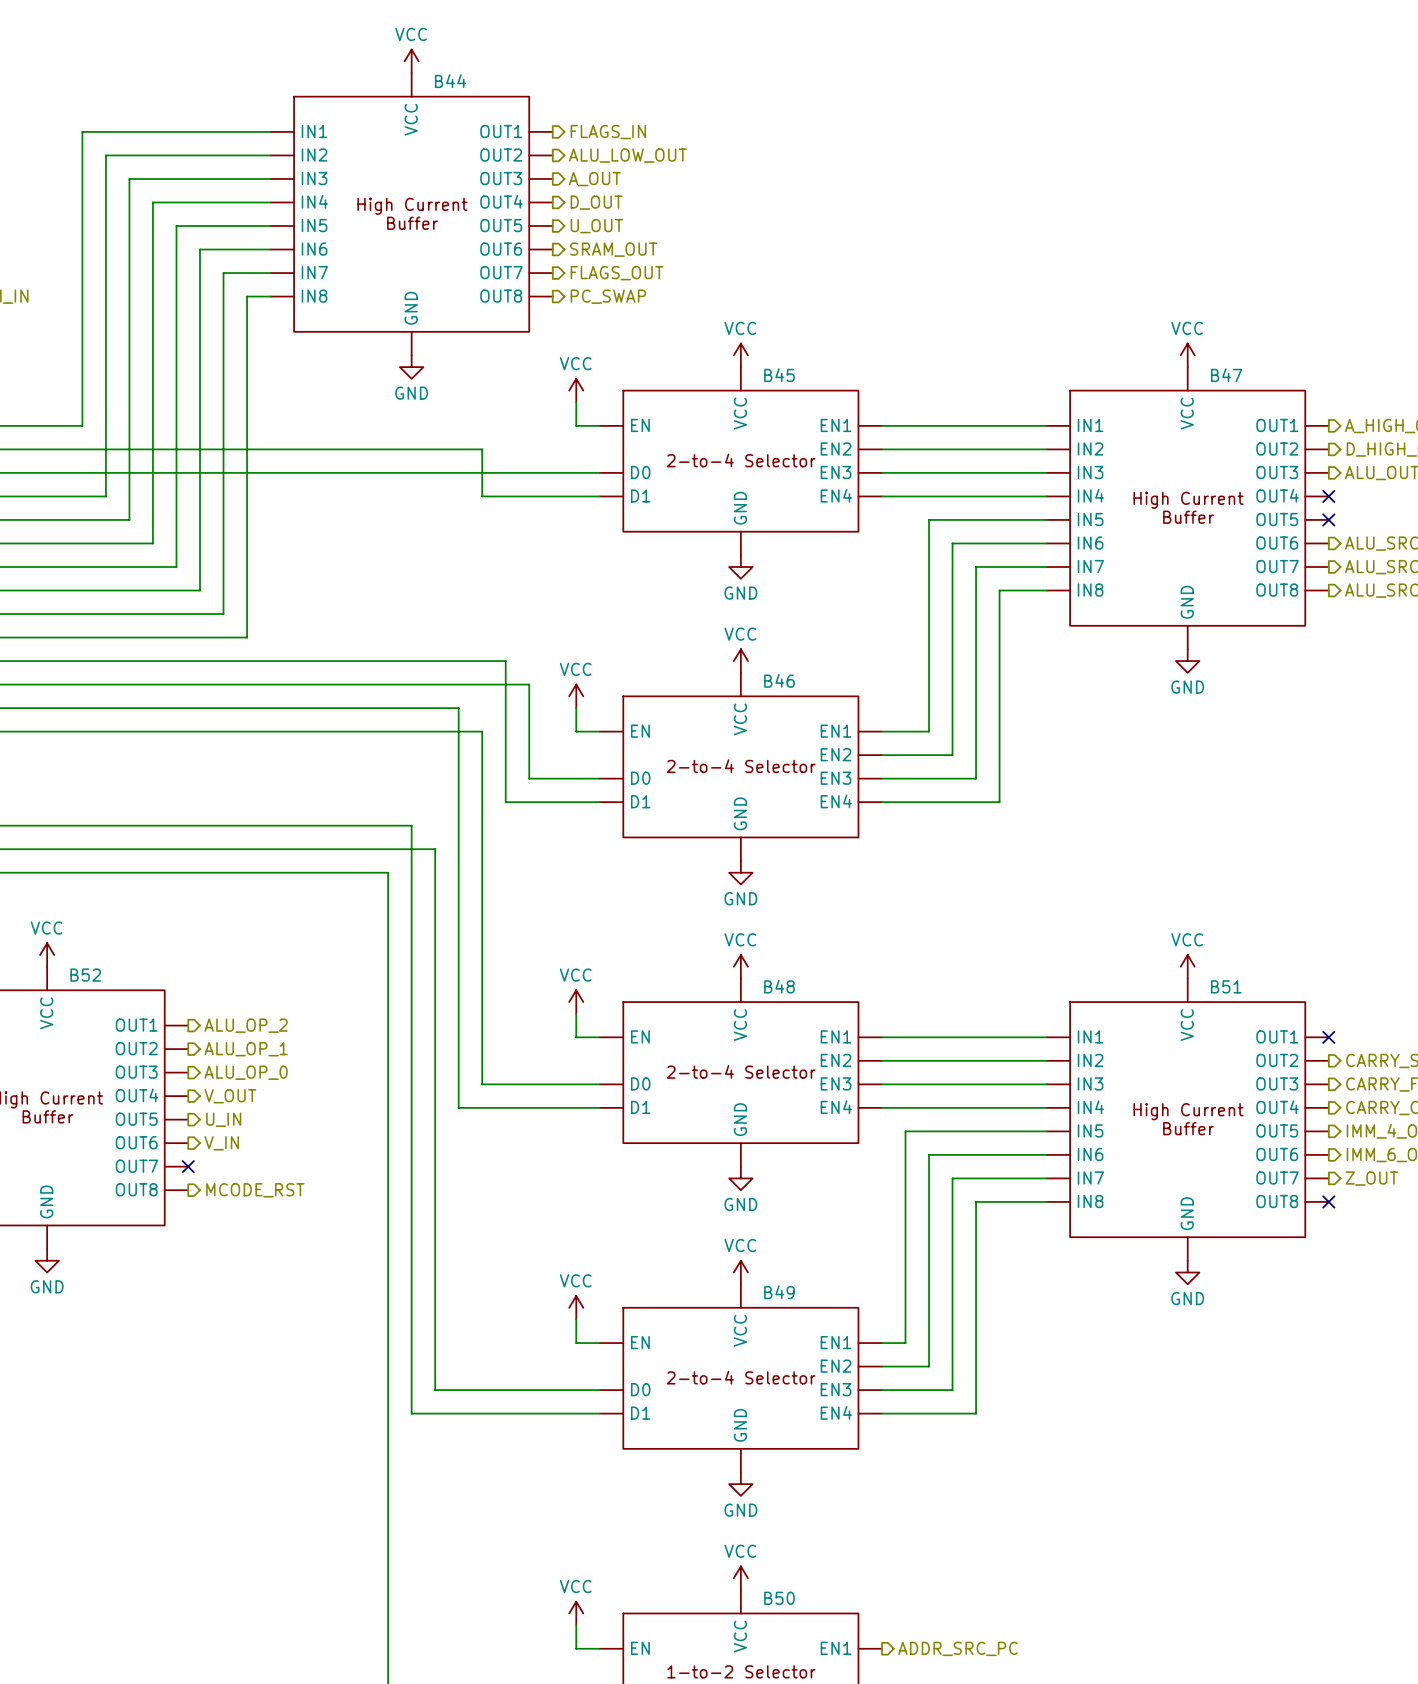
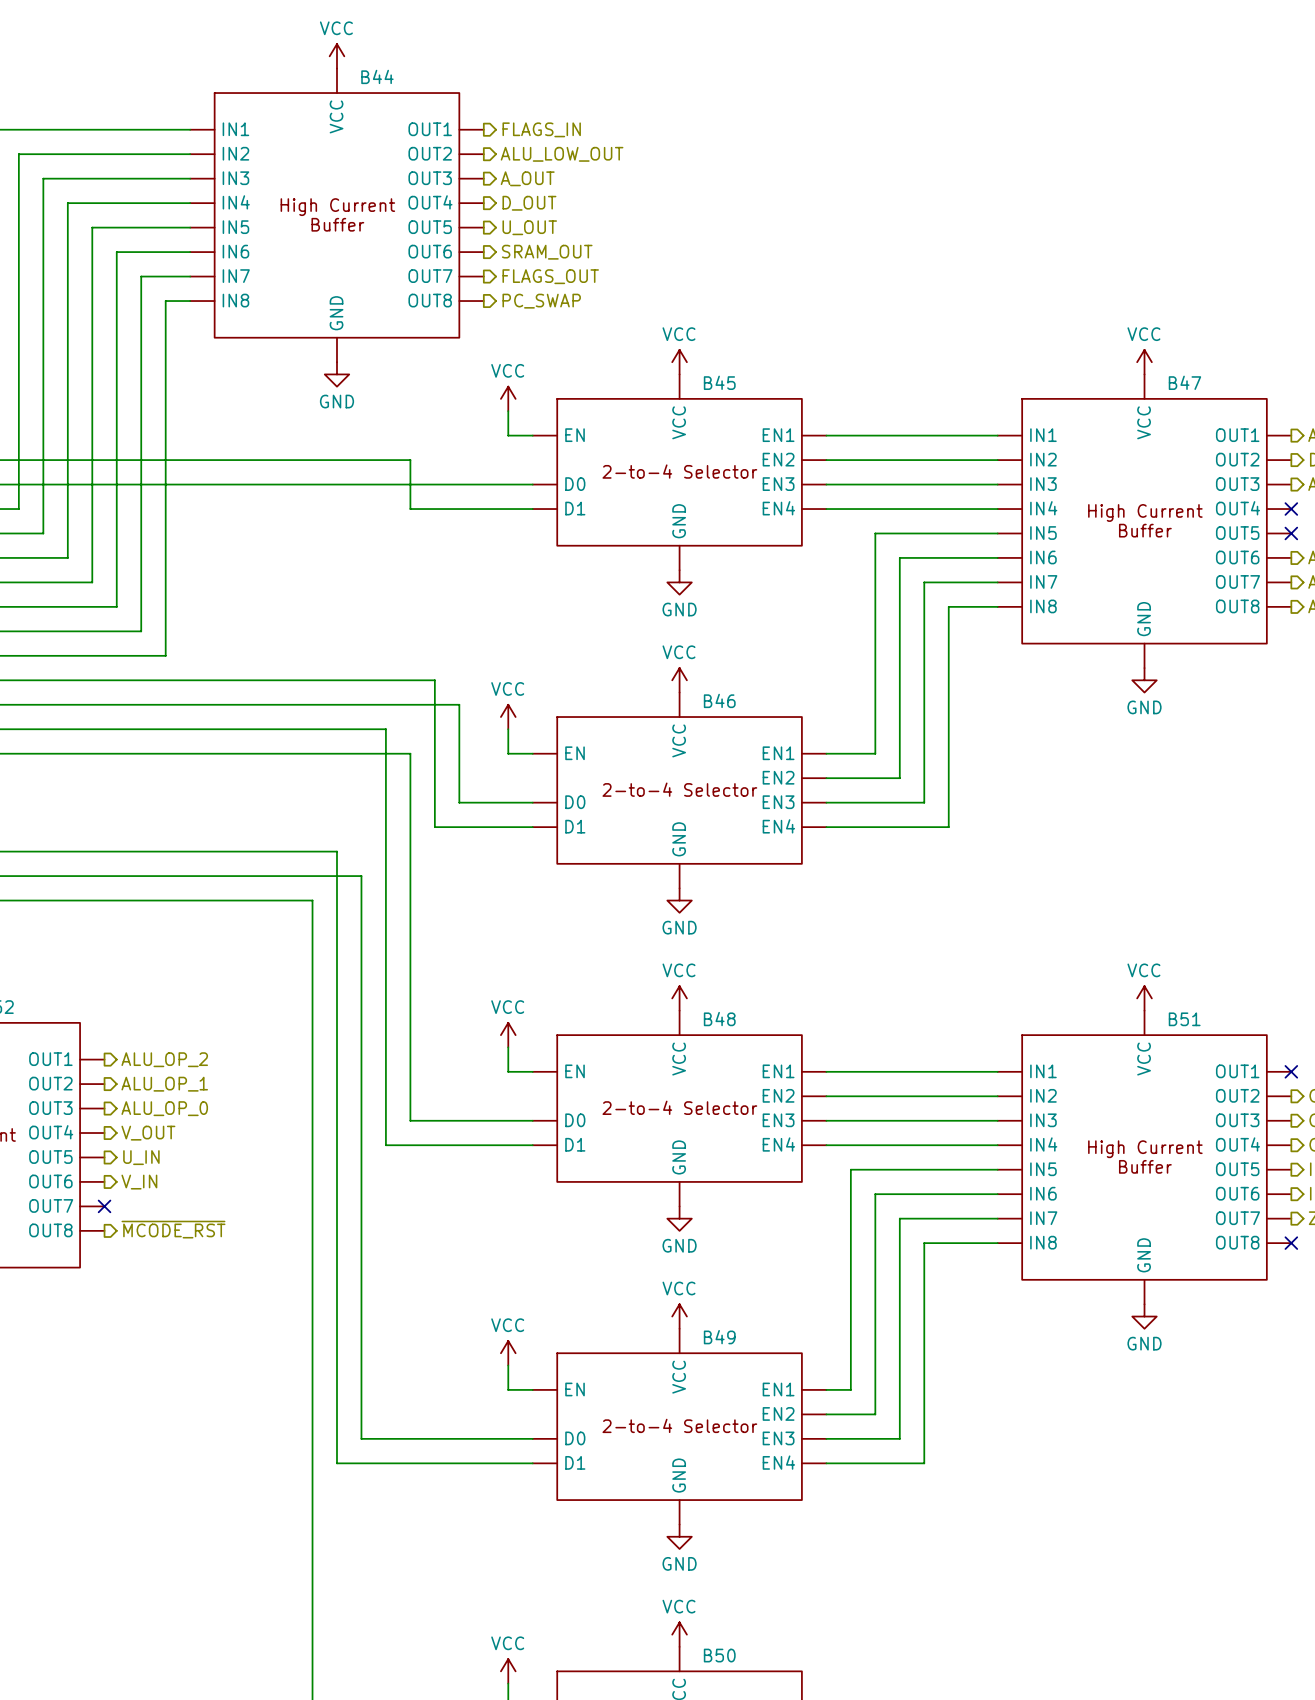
hierarchical label: MCODE_RST (255, 1190) -> ~{MCODE_RST} (173, 1229)

